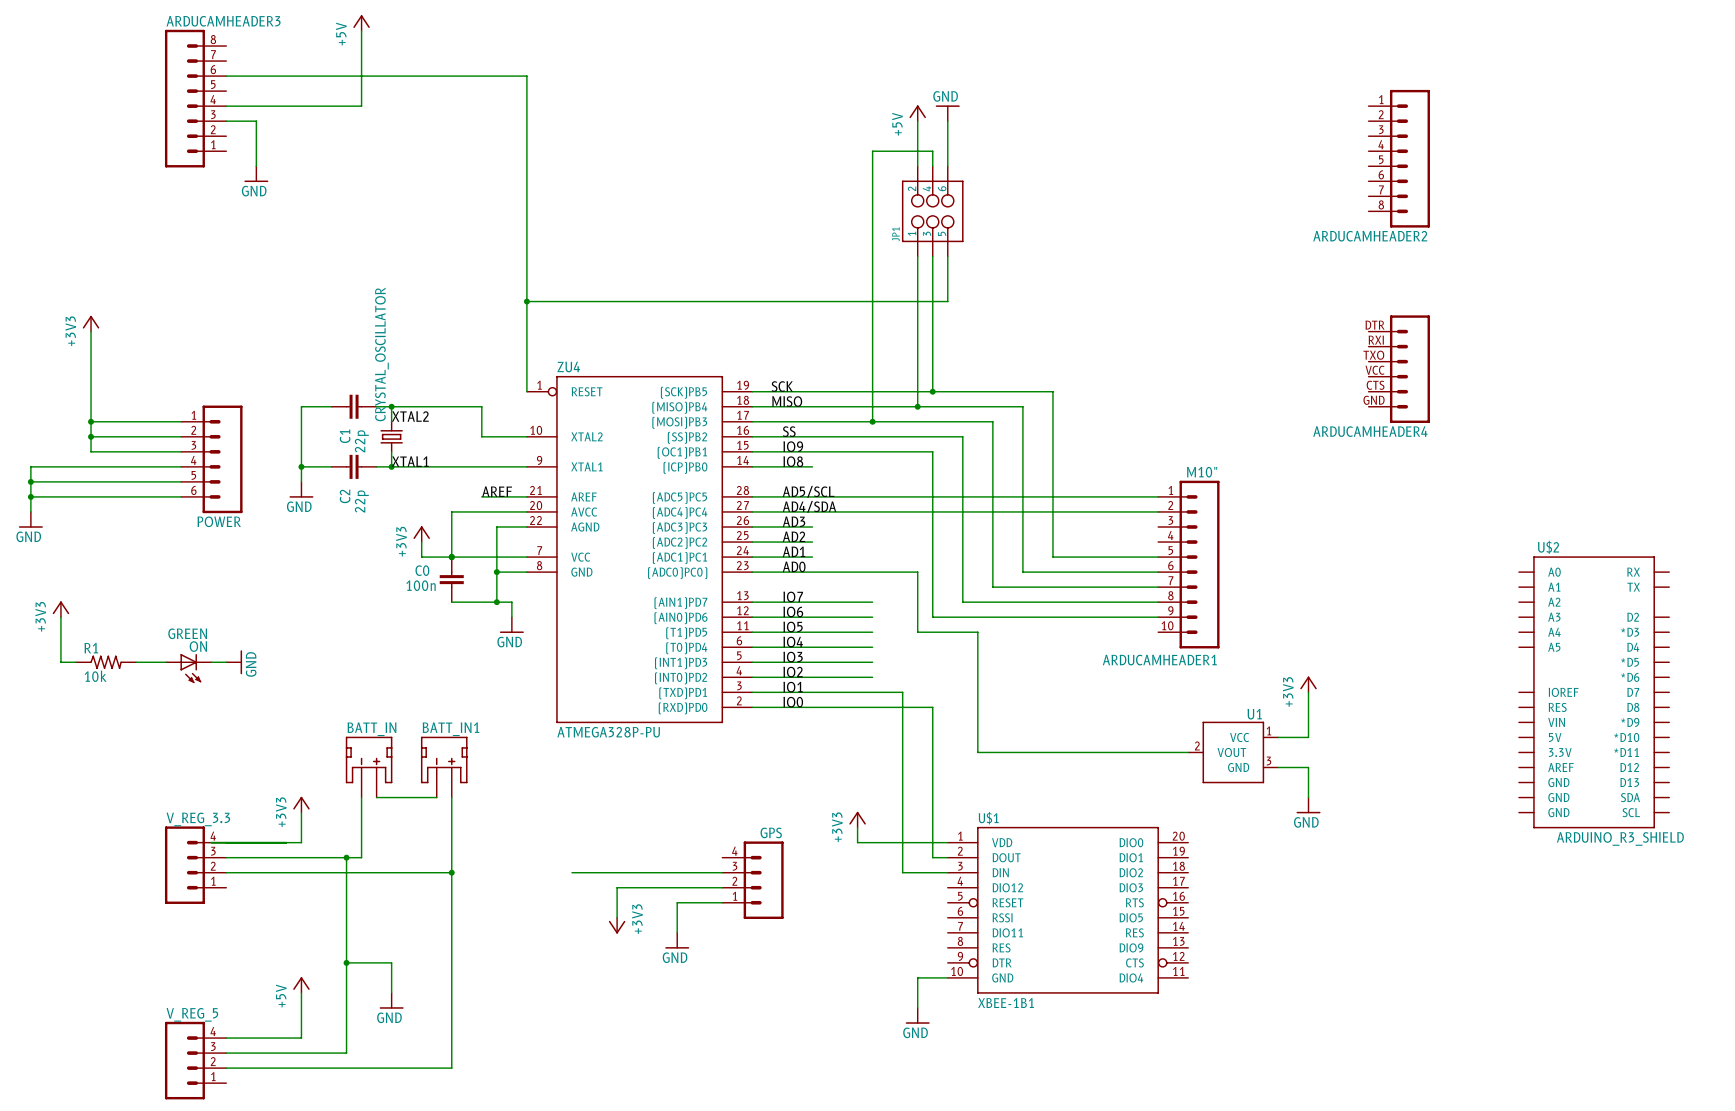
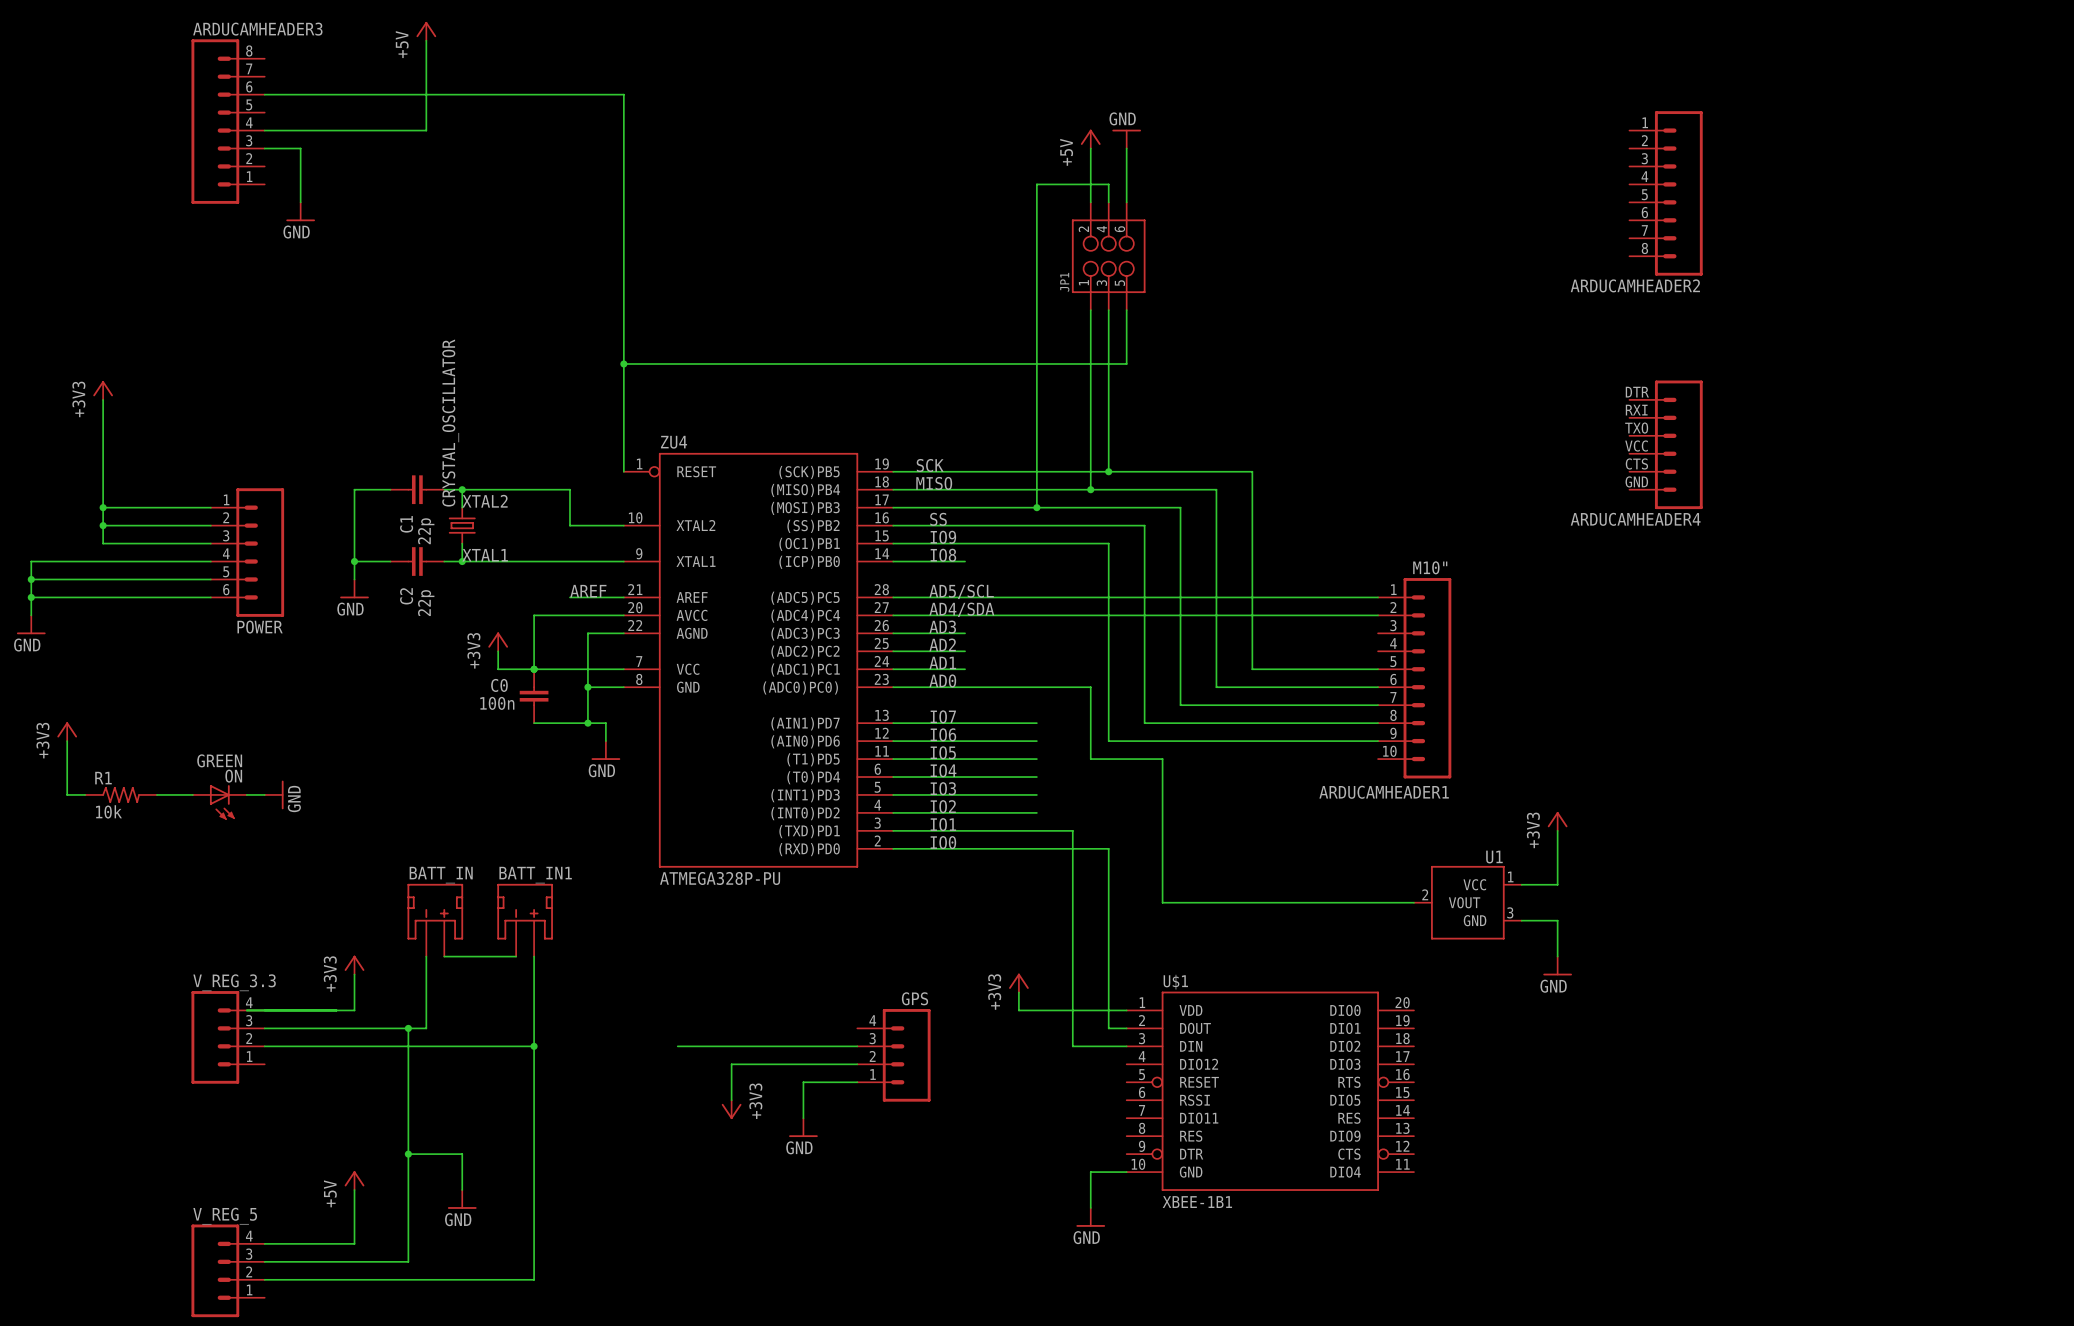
U$2: ARDUINO_R3_SHIELD (1594, 692) -> none

